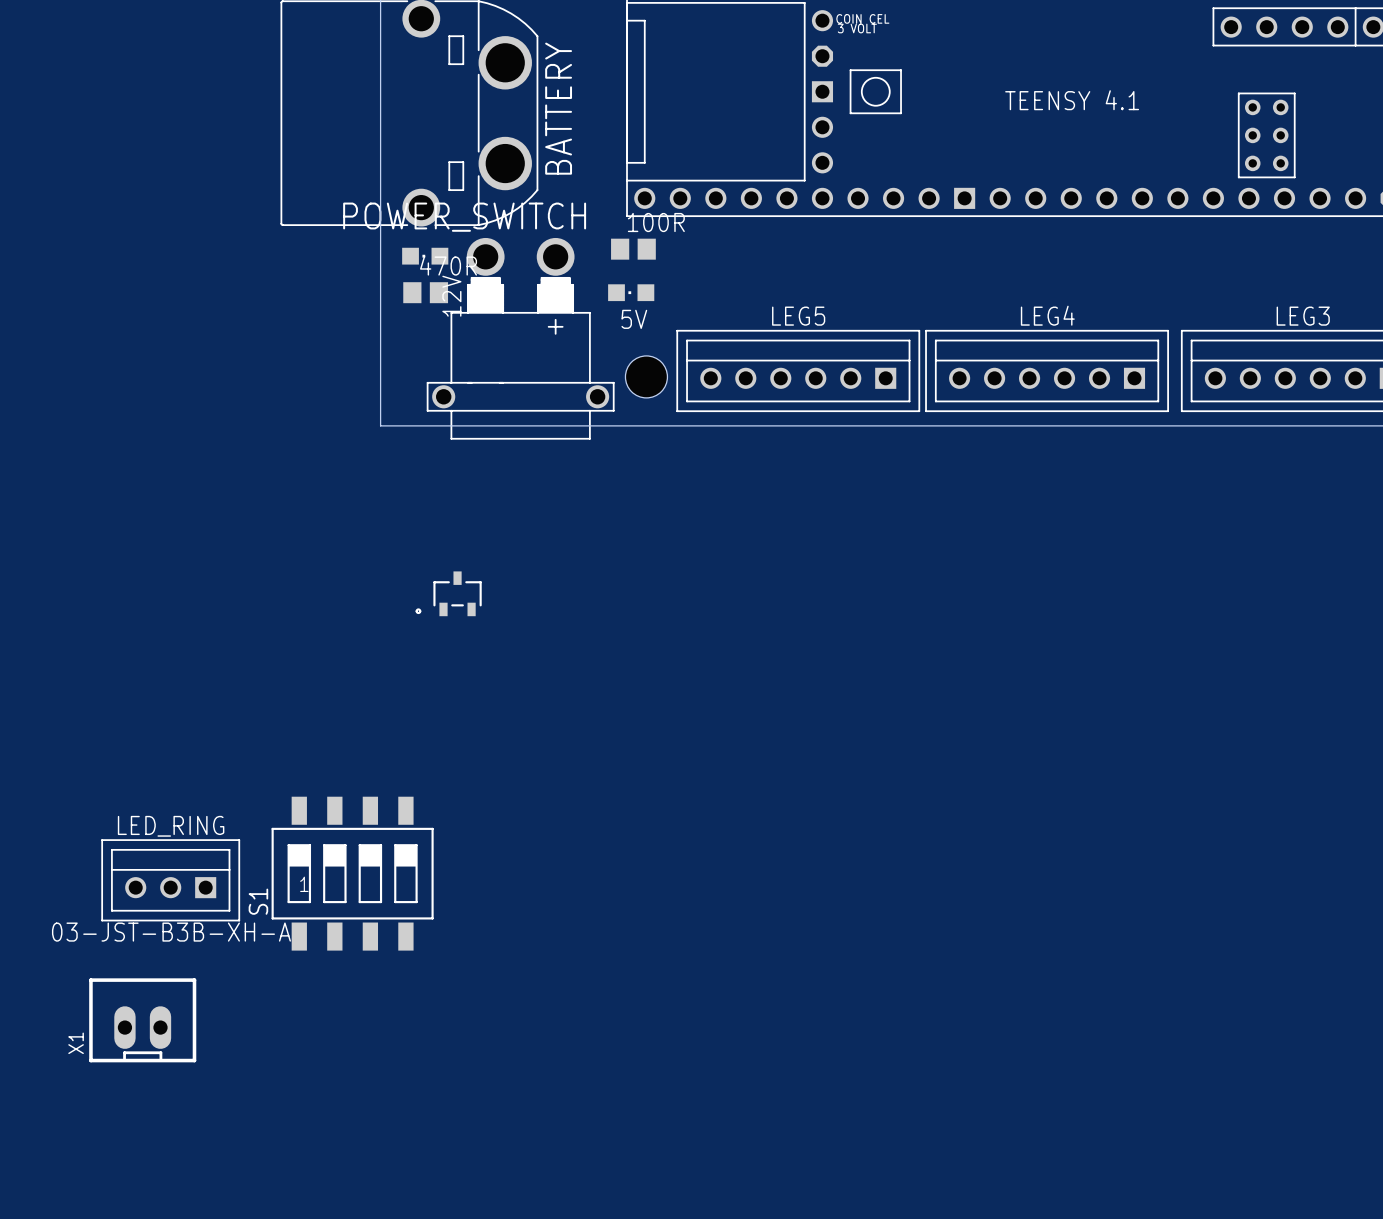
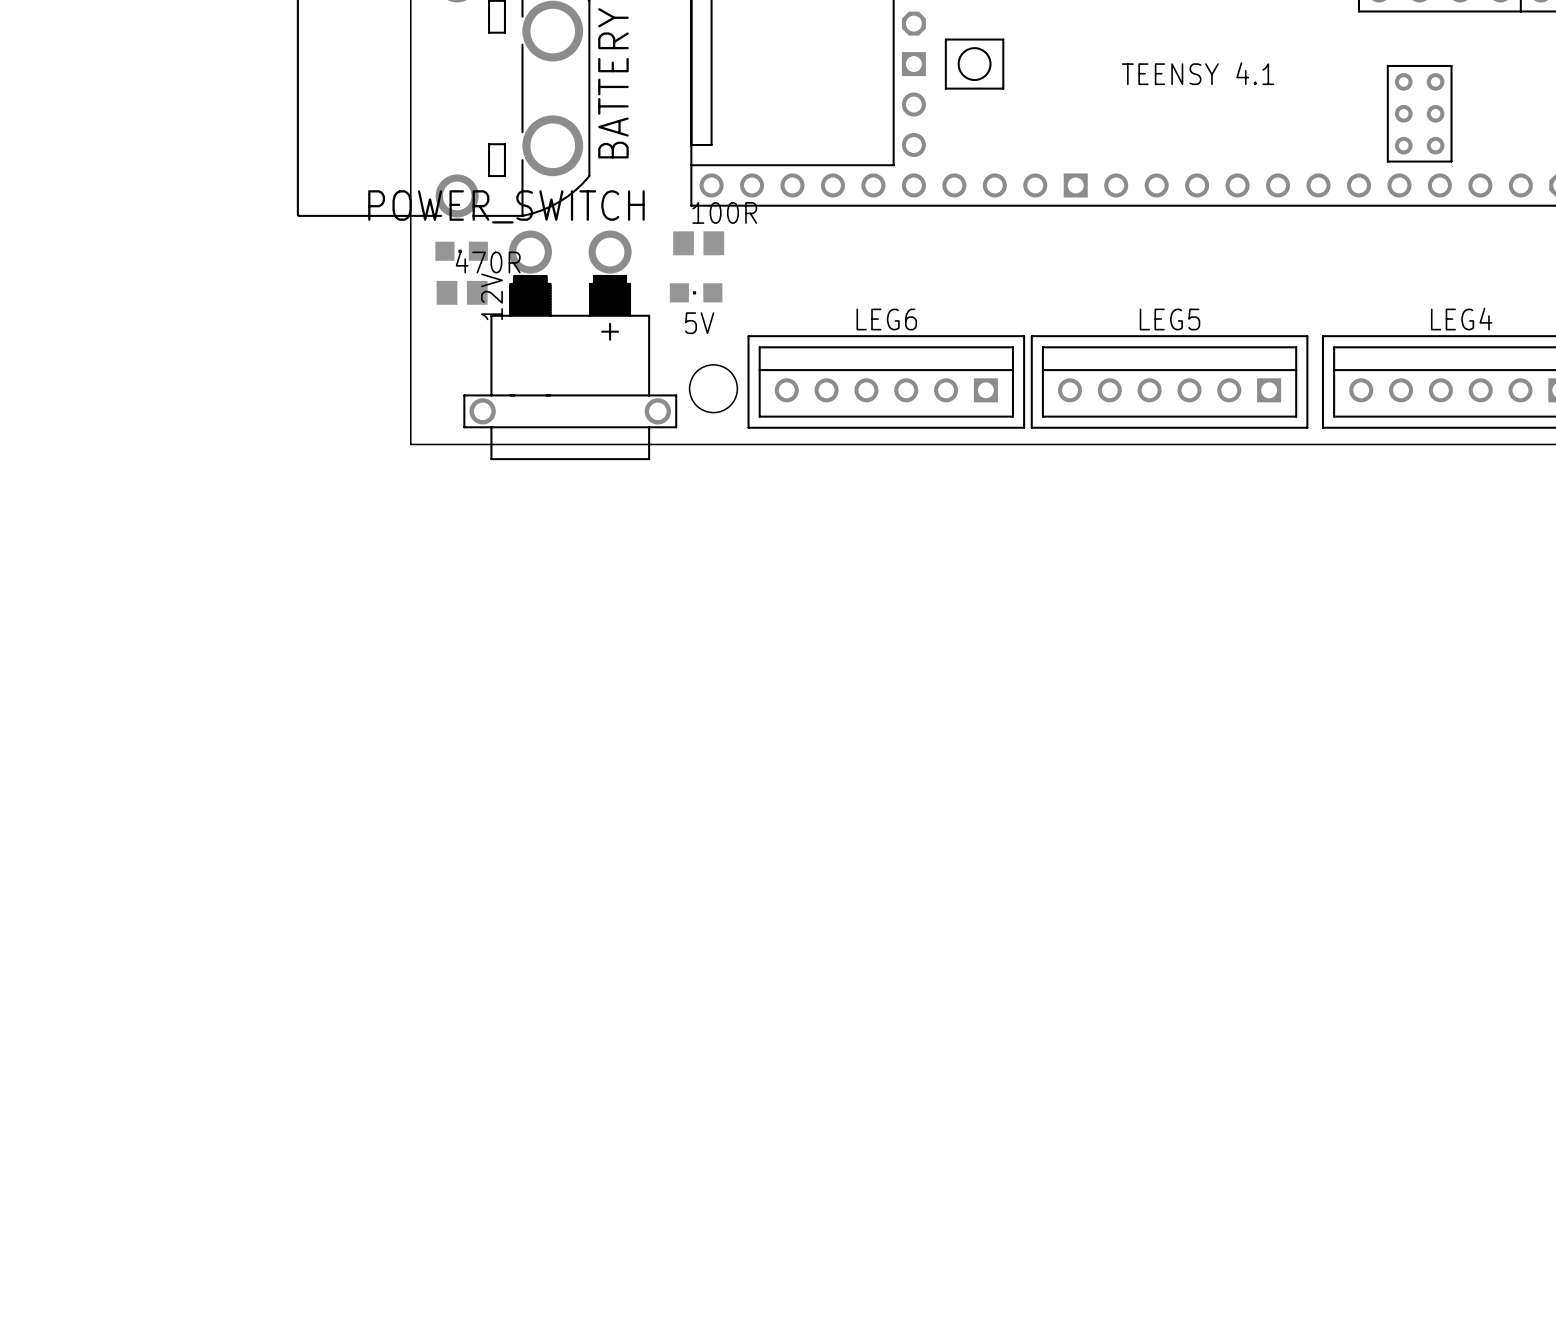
LEG4 name: LEG4 (1047, 315) -> LEG5 (1170, 319)
LEG5 name: LEG5 (798, 316) -> LEG6 (886, 319)
LEG3 name: LEG3 (1303, 316) -> LEG4 (1461, 319)
part: (448, 593) -> none
S1: (352, 873) -> none
LED_RING: 03-JST-B3B-XH-A (170, 880) -> none
X1: (142, 1020) -> none

